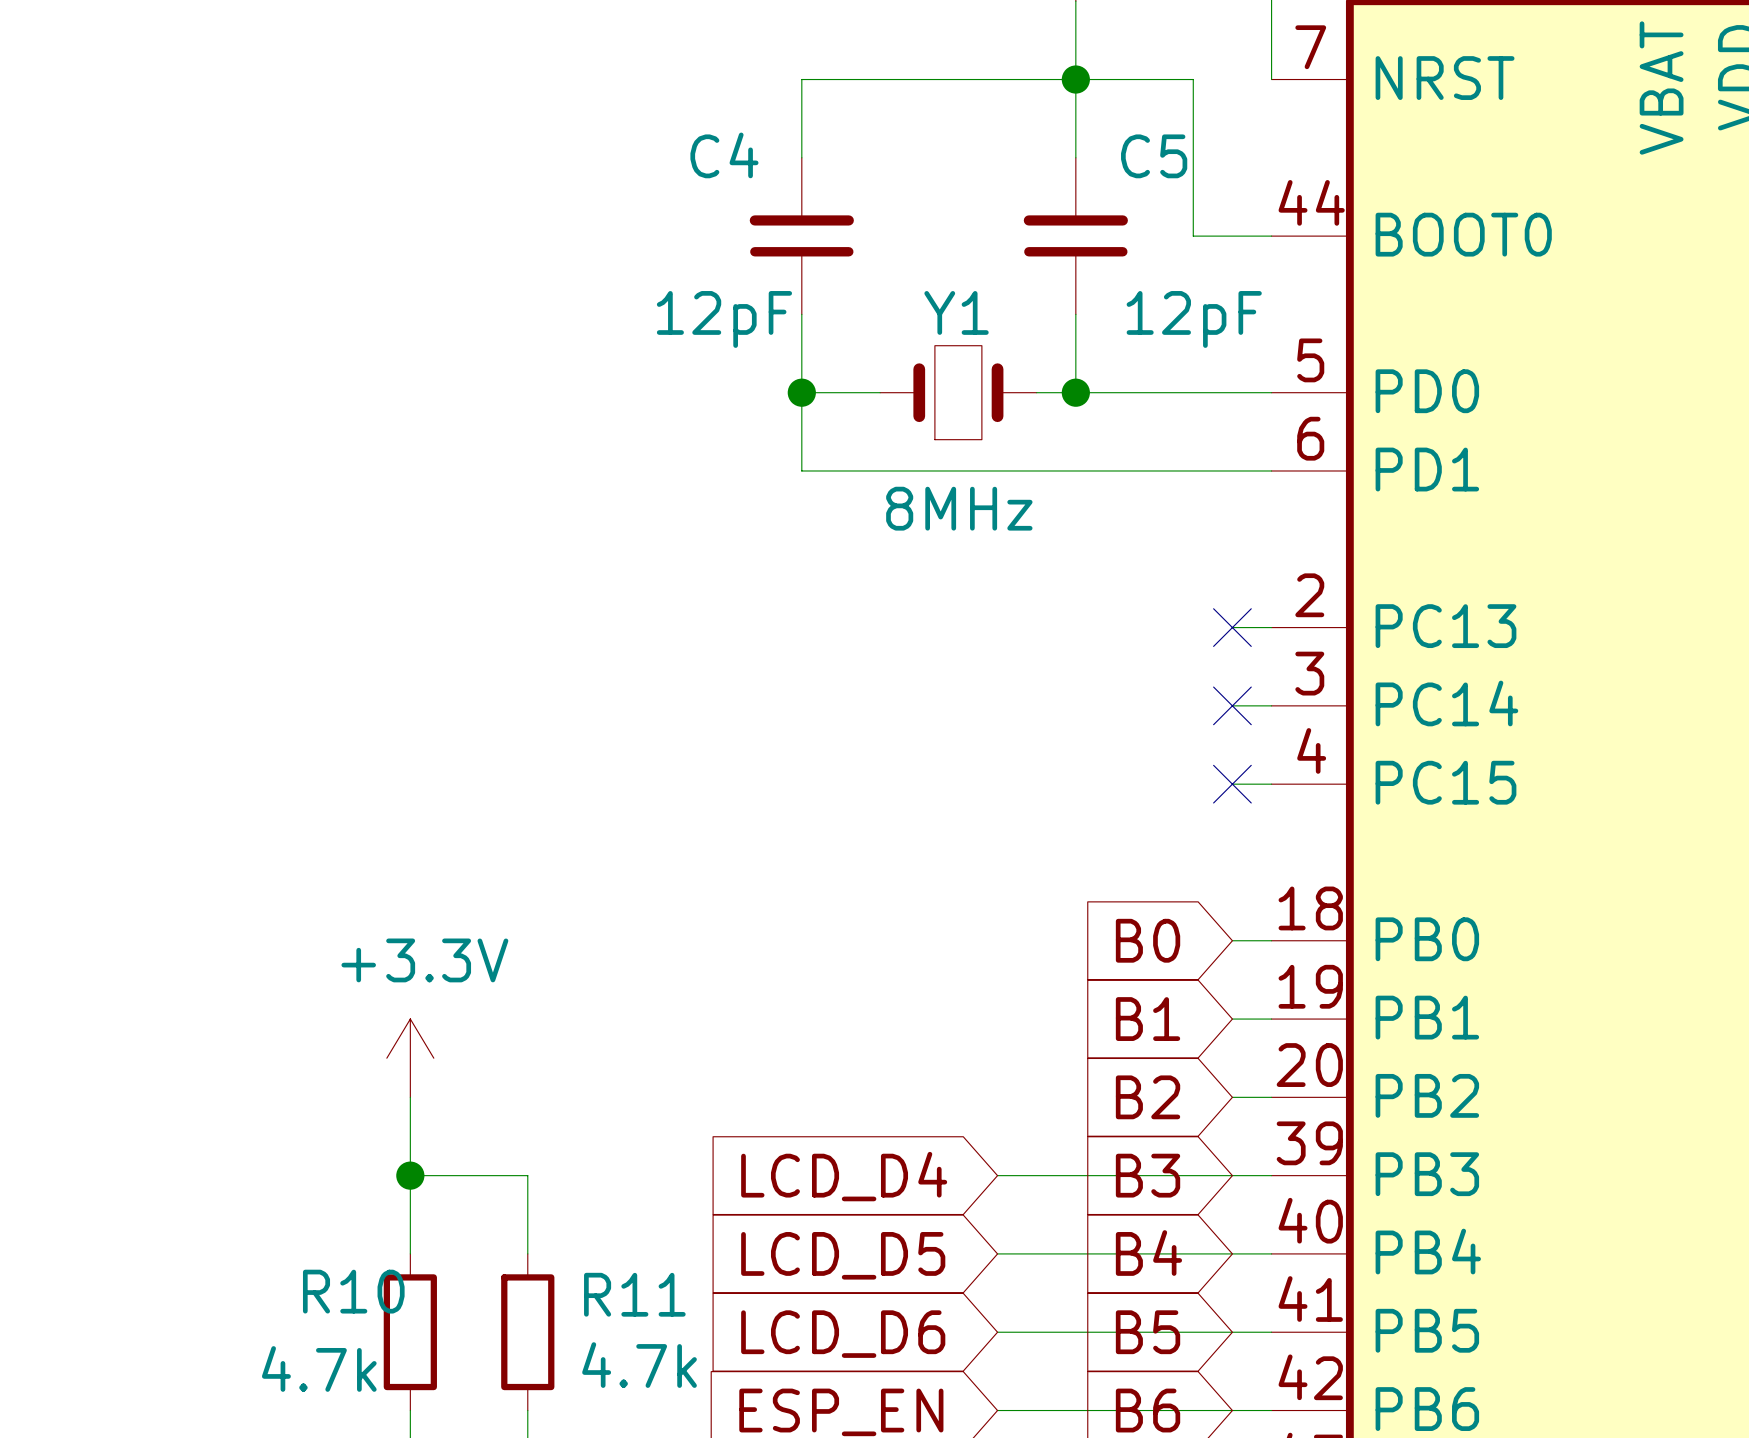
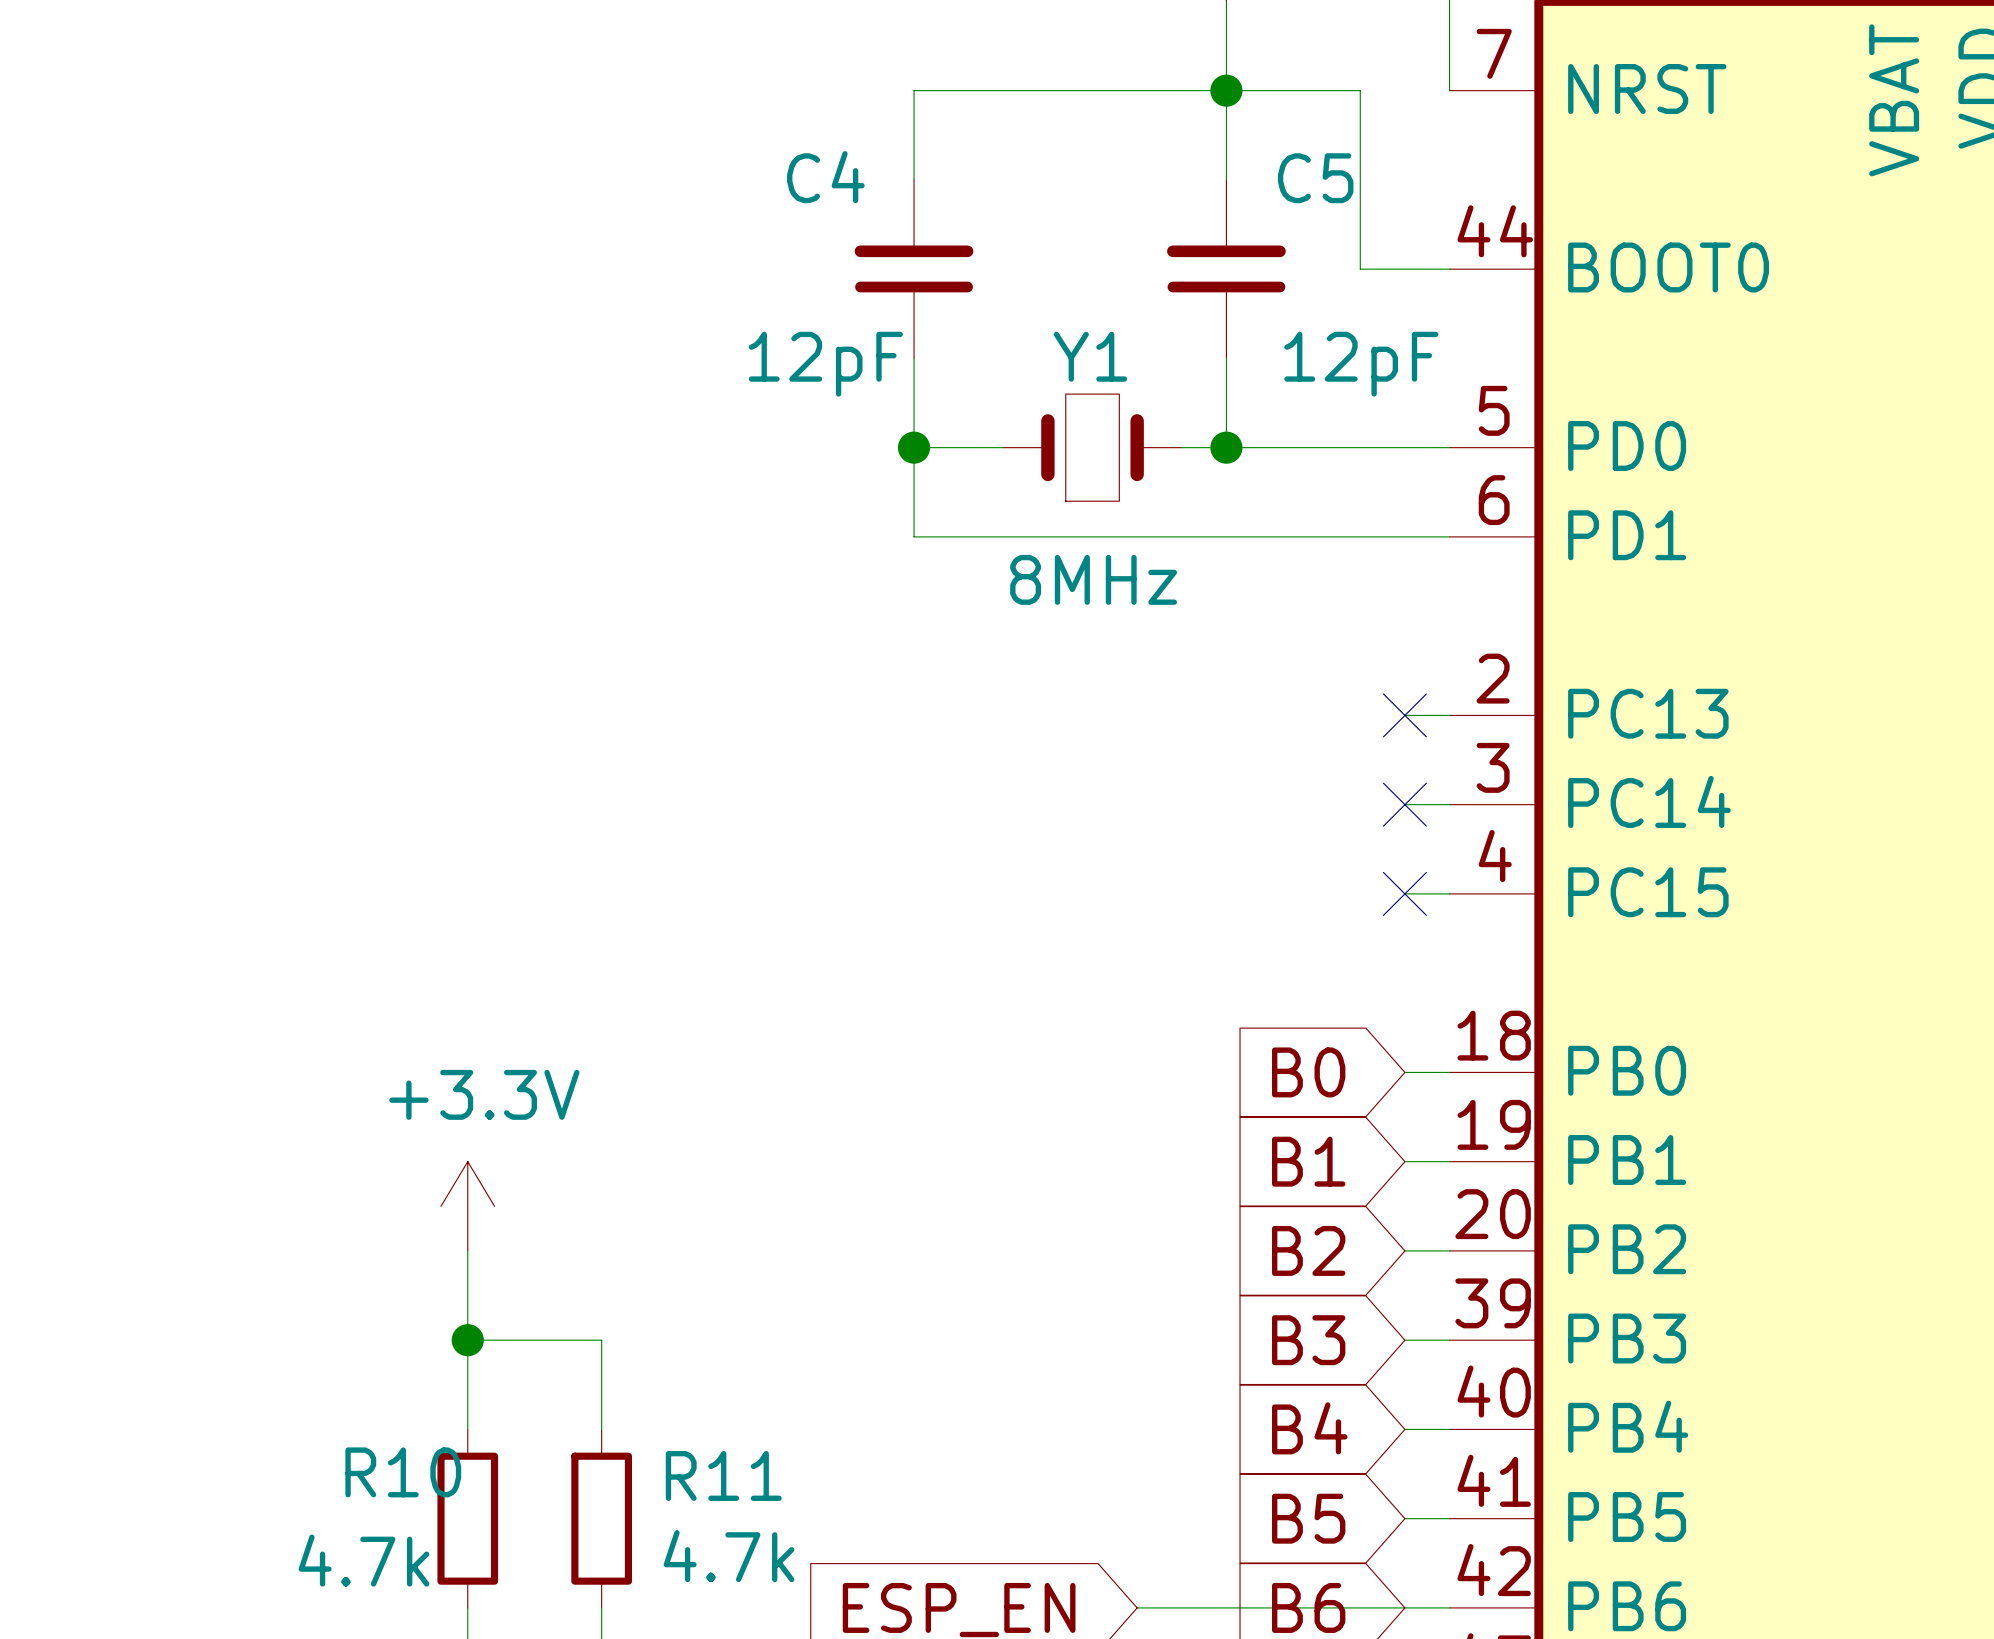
wire: (997, 1175) (1232, 1175) -> none
global label: LCD_D4 (844, 1176) -> none
wire: (997, 1253) (1232, 1253) -> none
global label: LCD_D5 (843, 1255) -> none
wire: (997, 1332) (1232, 1332) -> none
global label: LCD_D6 (843, 1334) -> none

